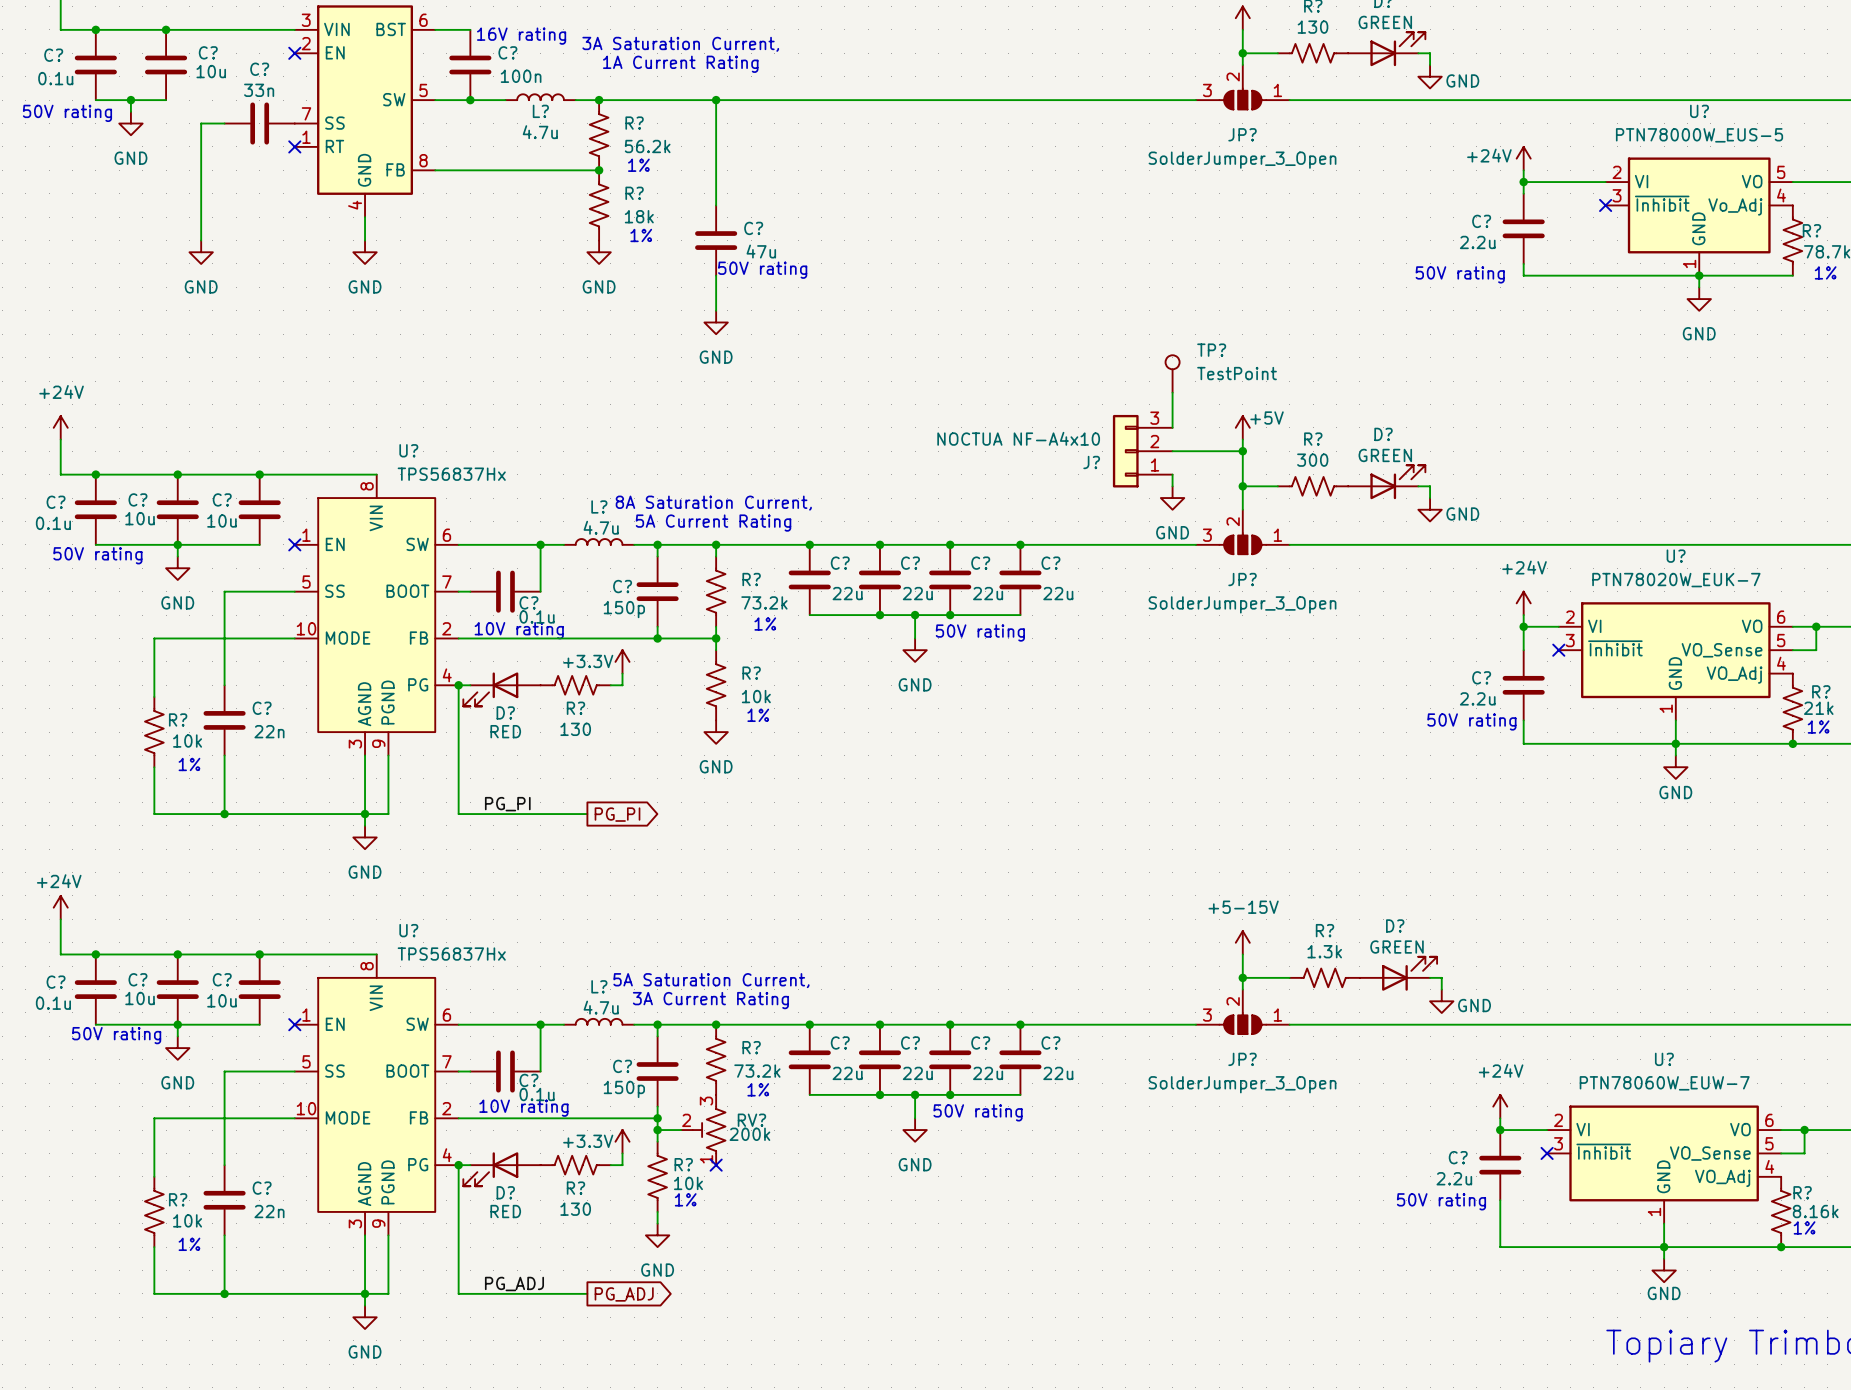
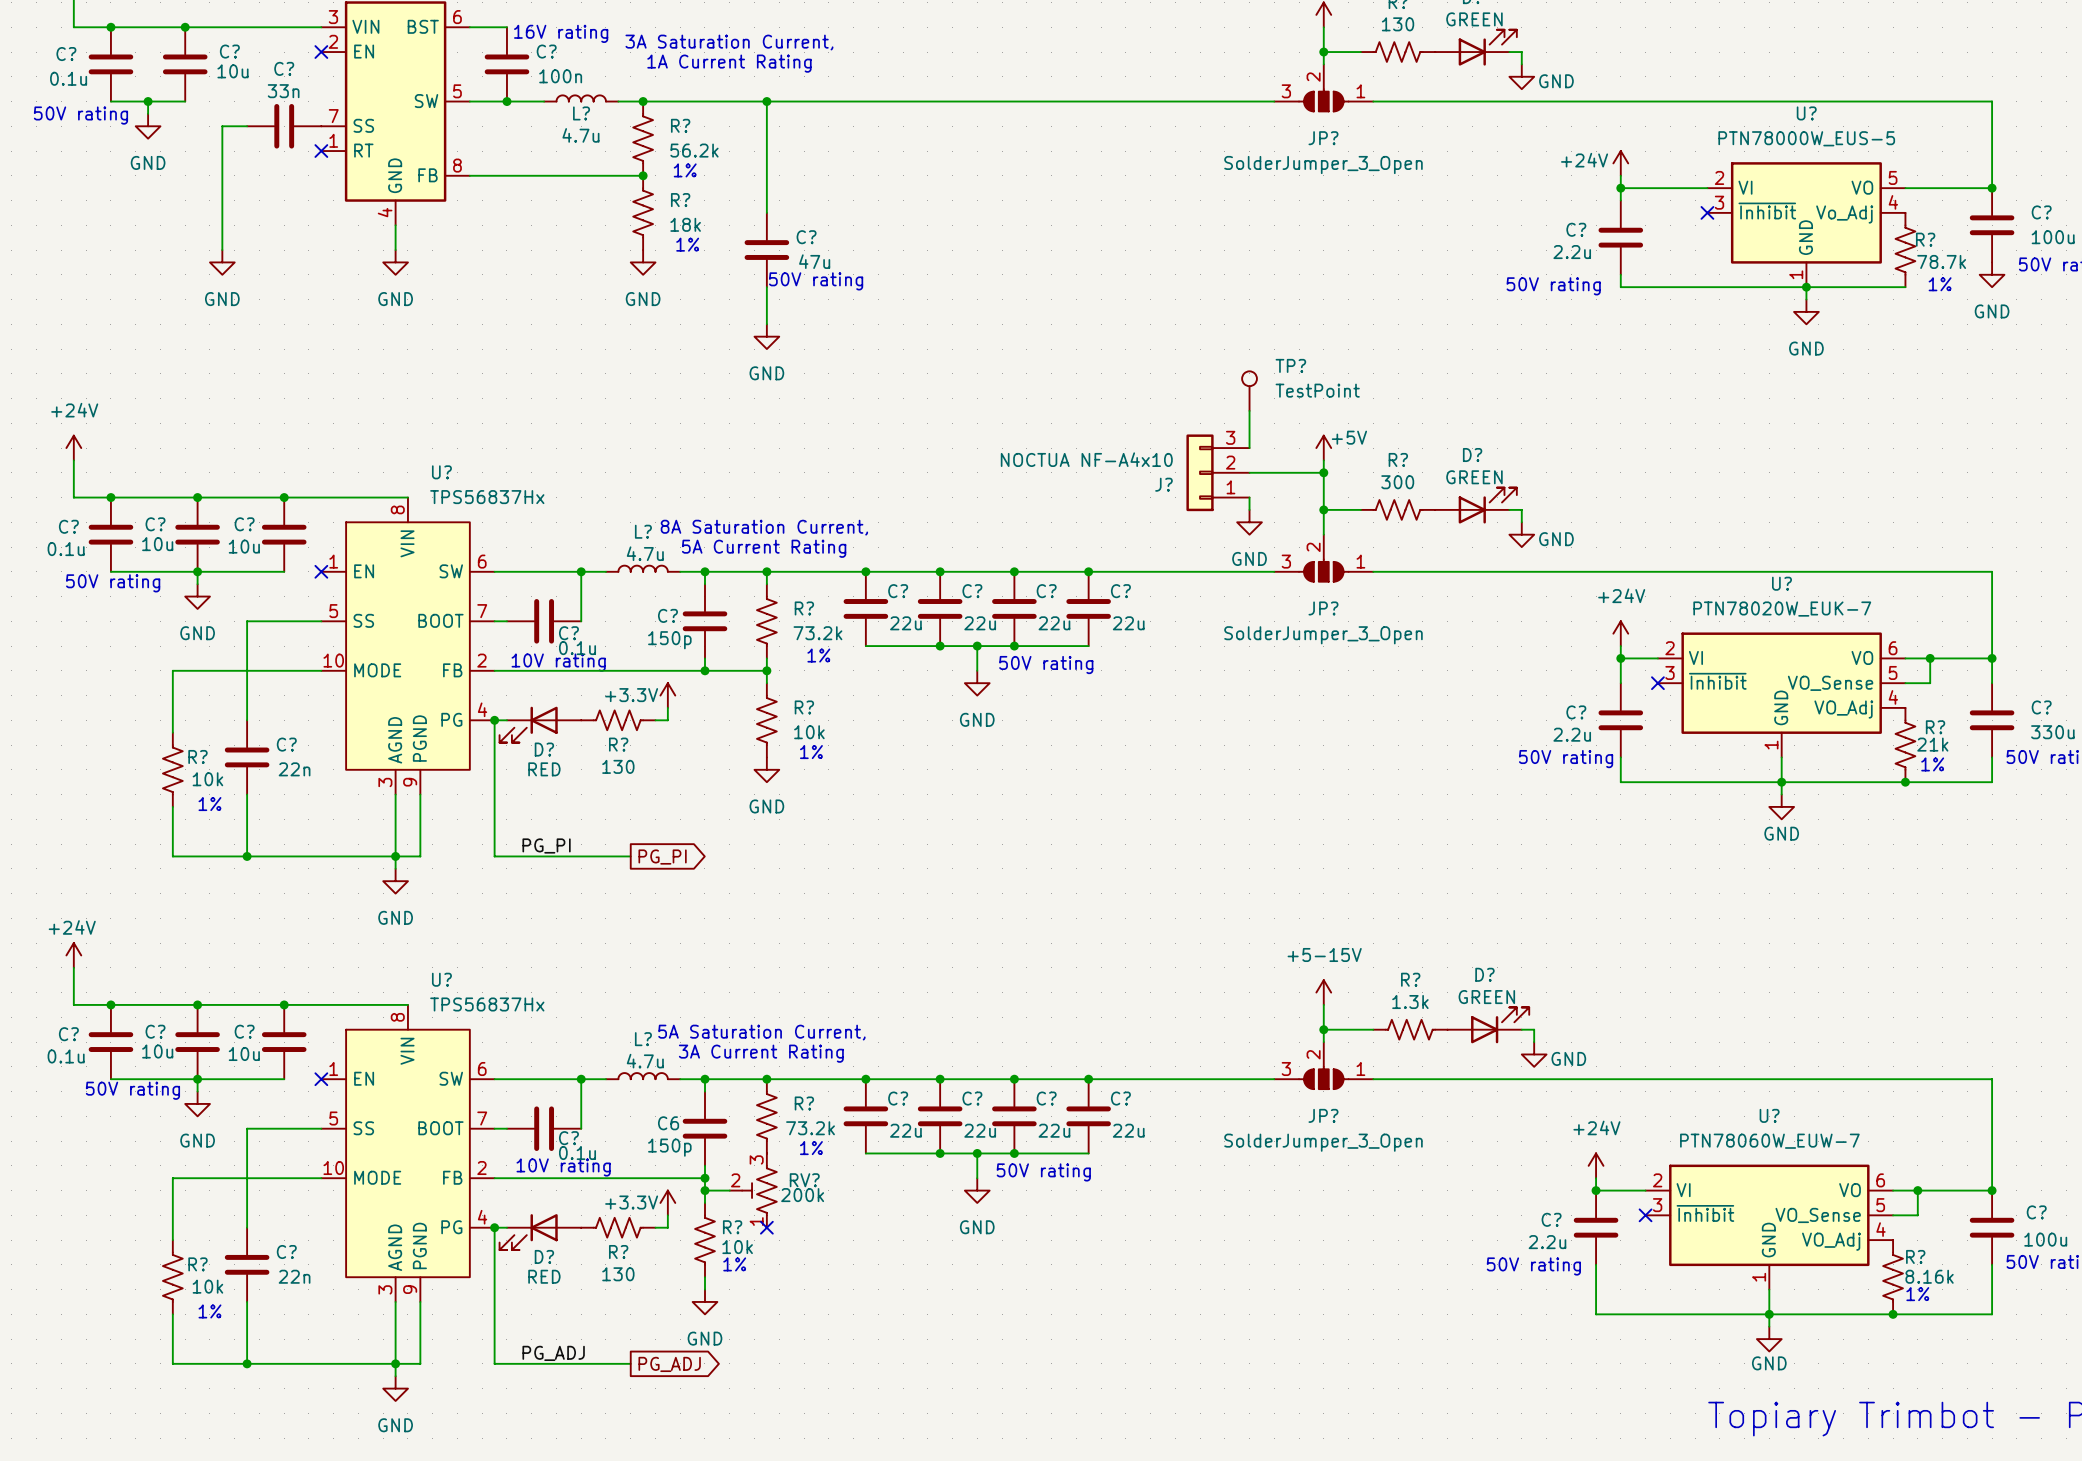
C? name: C? (622, 1066) -> C6 (668, 1123)

